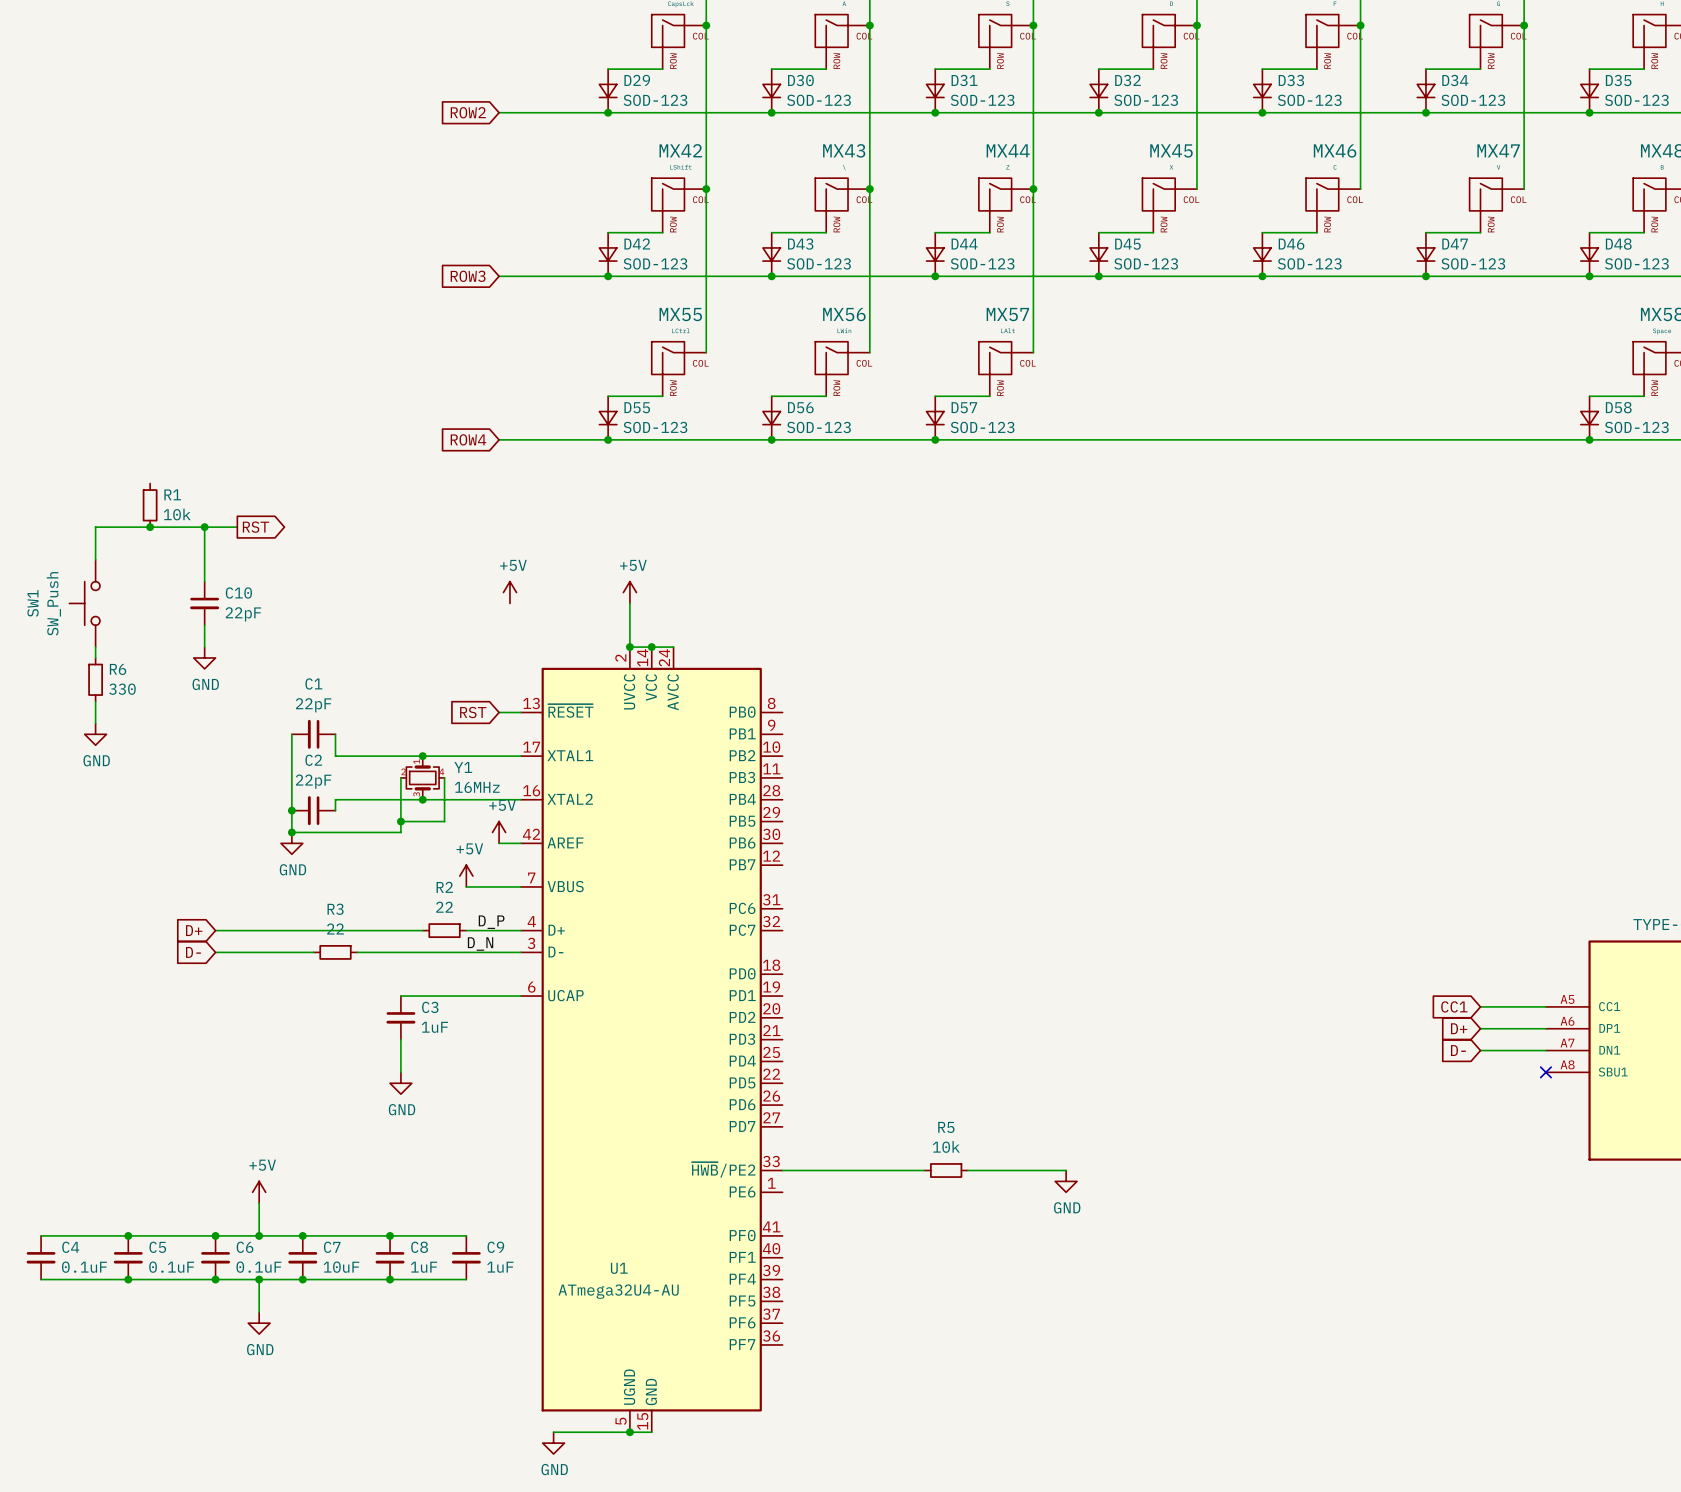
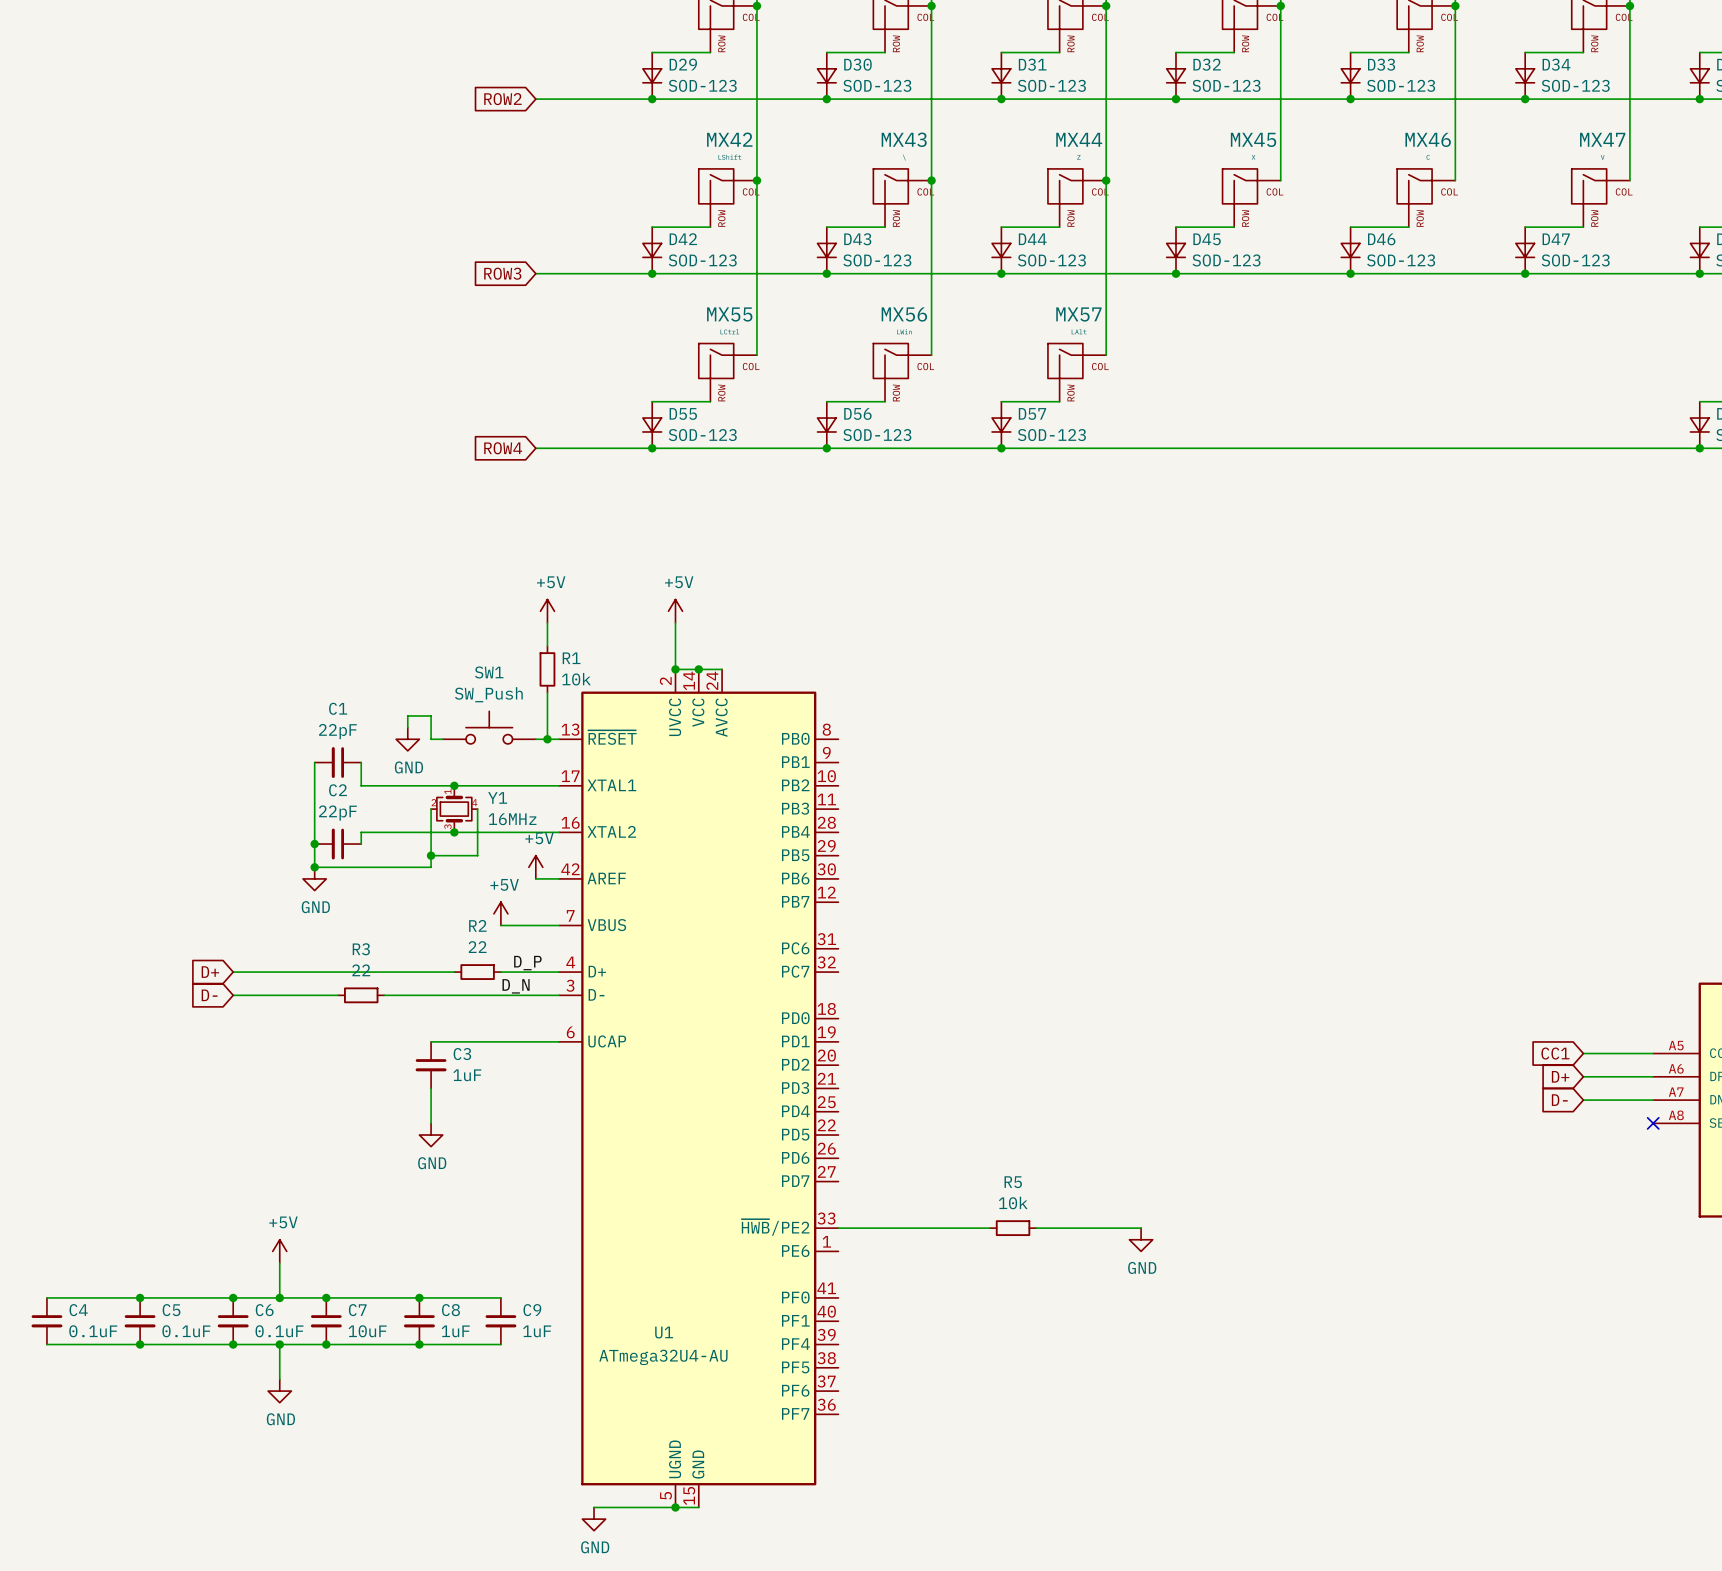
R1 position: (150, 505) -> (547, 669)
junction: (150, 527) -> none
wire: (204, 527) (204, 581) -> none
junction: (204, 527) -> none
wire: (237, 527) (95, 527) (95, 559) -> none
global label: RST (256, 527) -> none
SW1 rotation: 0° (84, 603) -> 90° clockwise (489, 727)
SW1 position: (84, 603) -> (489, 727)
C10: 22pF (204, 603) -> none
wire: none -> (547, 622) (547, 646)
wire: (204, 625) (204, 647) -> none
wire: (95, 647) (95, 657) -> none
power symbol: GND (204, 657) -> none
wire: none -> (547, 692) (547, 739)
R6: 330 (95, 679) -> none
wire: (95, 701) (95, 723) -> none
wire: none -> (407, 727) (407, 715) (431, 715) (431, 739) (442, 739)
power symbol: none -> GND (407, 739)
global label: RST (473, 712) -> none
junction: none -> (547, 739)
power symbol: GND (95, 734) -> none

